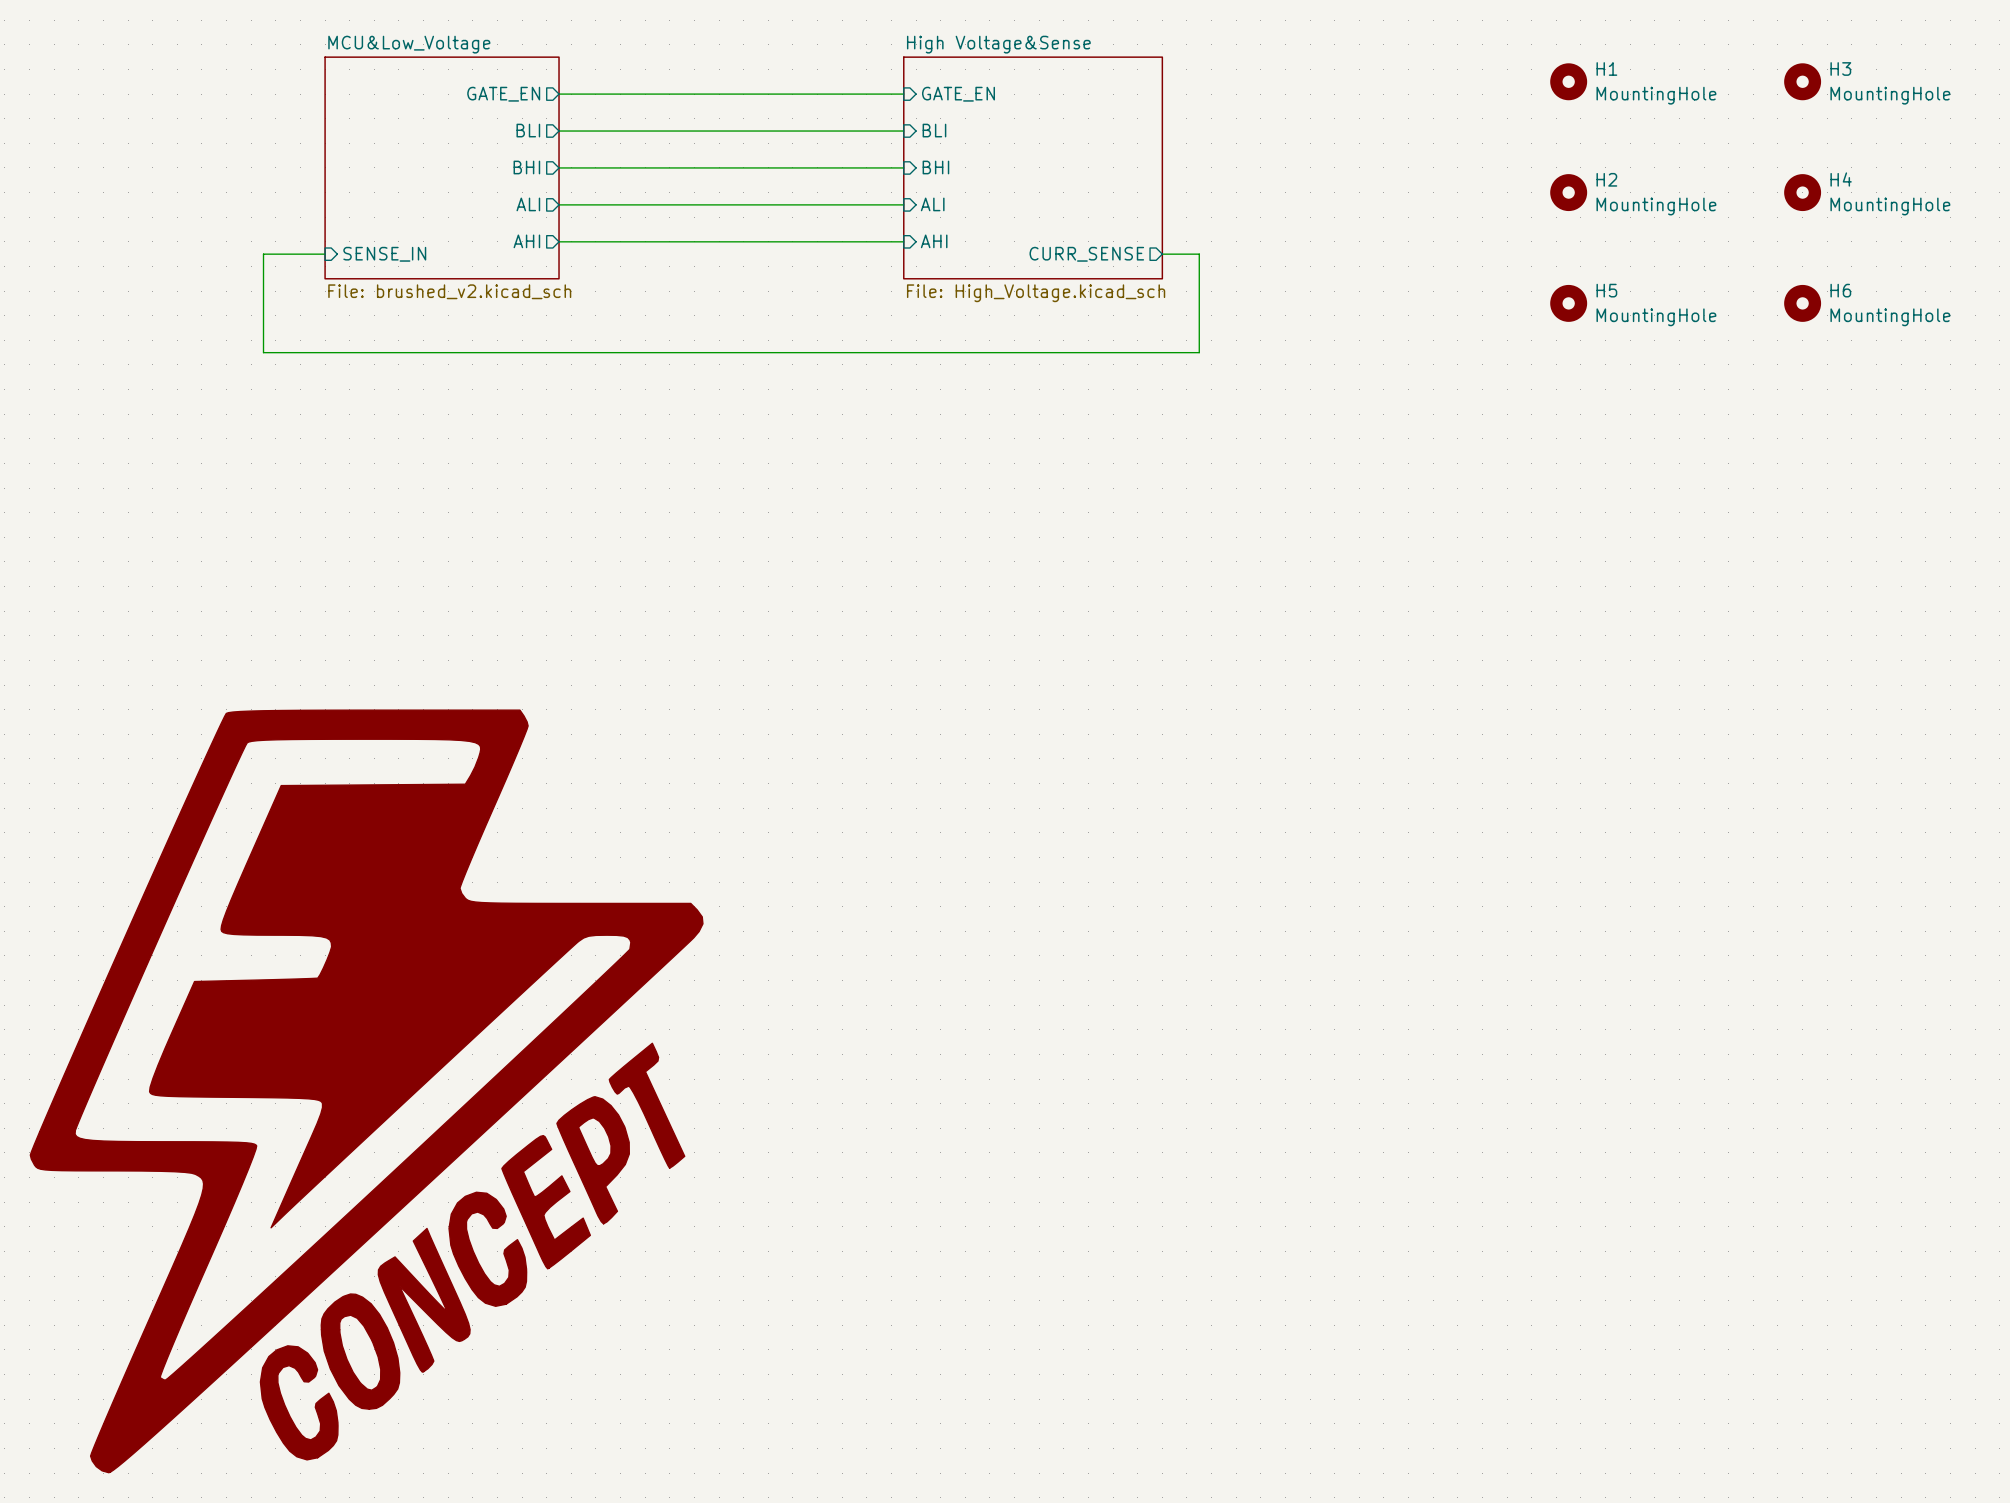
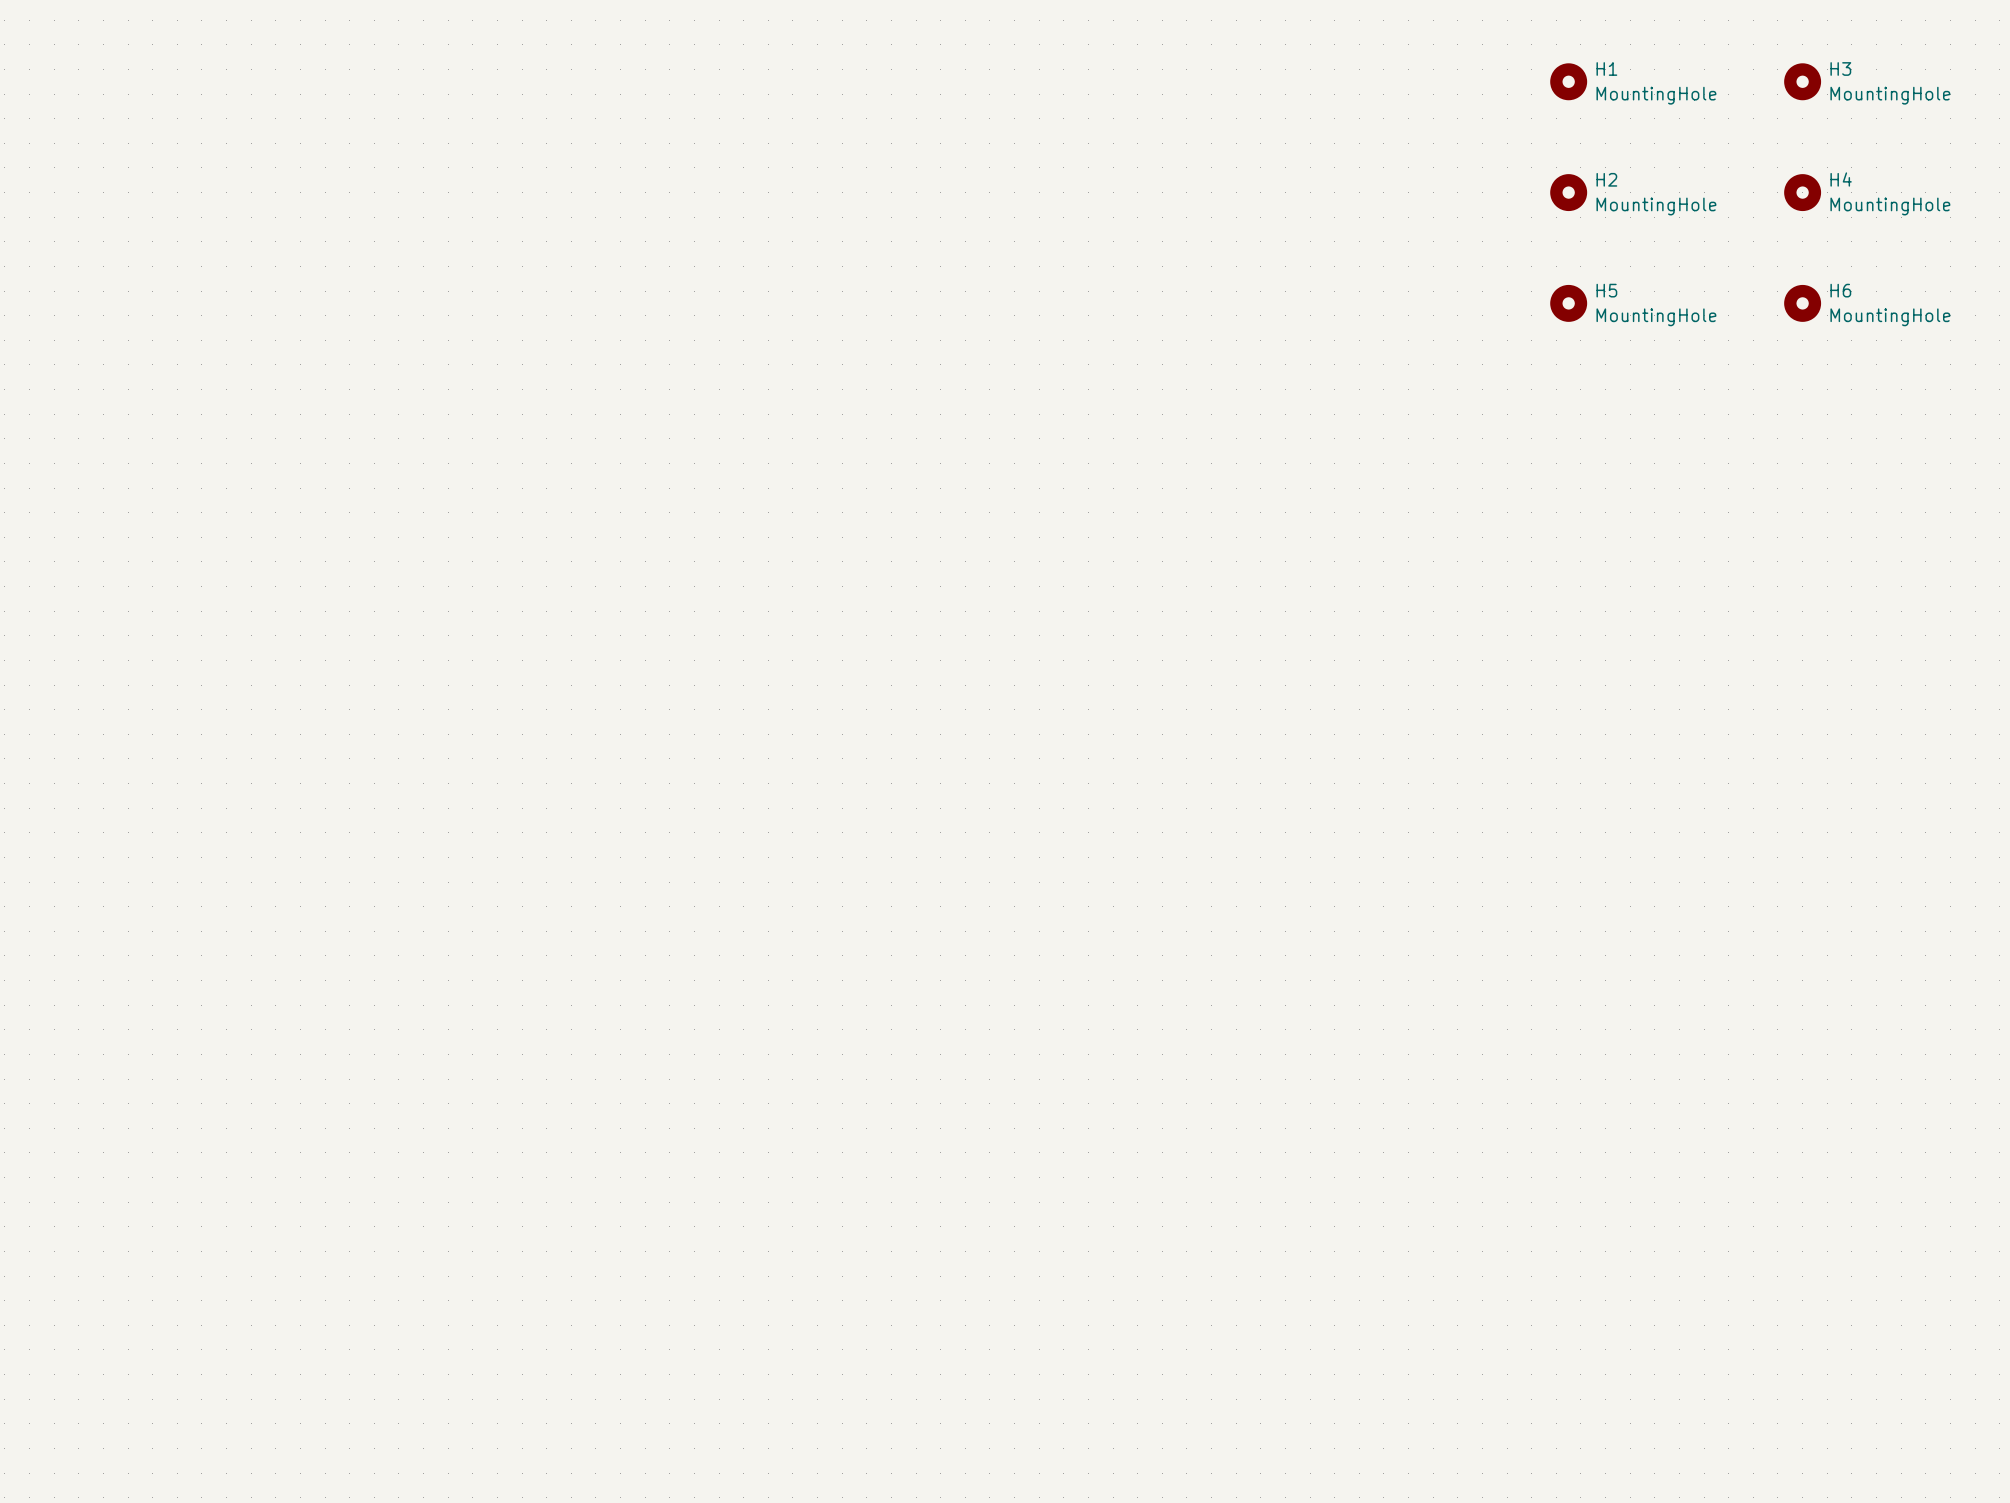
sheet pin: GATE_EN (503, 94) -> none
wire: (559, 94) (903, 94) -> none
sheet pin: GATE_EN (958, 94) -> none
sheet pin: BLI (528, 130) -> none
sheet pin: BLI (934, 130) -> none
wire: (559, 131) (903, 131) -> none
sheet MCU&Low_Voltage: File: brushed_v2.kicad_sch (442, 167) -> none
sheet pin: BHI (526, 167) -> none
wire: (559, 167) (903, 167) -> none
sheet pin: BHI (935, 167) -> none
sheet High Voltage&Sense: File: High_Voltage.kicad_sch (1033, 167) -> none
sheet pin: ALI (528, 204) -> none
wire: (559, 204) (903, 204) -> none
sheet pin: ALI (932, 204) -> none
sheet pin: AHI (526, 241) -> none
wire: (559, 241) (903, 241) -> none
sheet pin: AHI (934, 241) -> none
wire: (325, 254) (263, 254) (263, 352) (1199, 352) (1199, 254) (1162, 254) -> none
sheet pin: SENSE_IN (384, 254) -> none
sheet pin: CURR_SENSE (1086, 254) -> none
power symbol: (366, 1091) -> none

